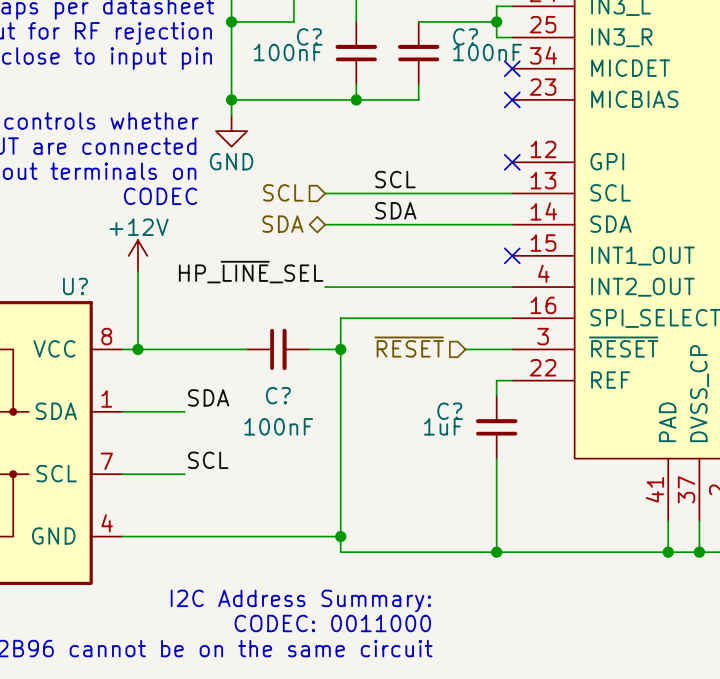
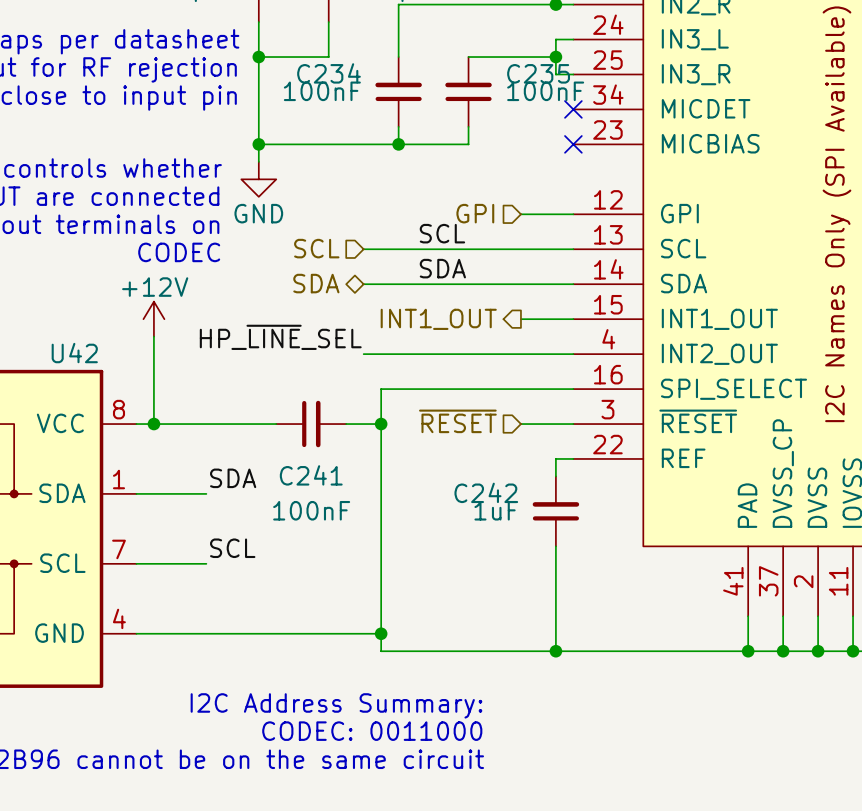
C? name: C? (309, 36) -> C234 (329, 73)
C? name: C? (465, 36) -> C235 (538, 73)
hierarchical label: none -> GPI (475, 213)
wire: none -> (520, 214) (573, 214)
no-connect mark: (512, 162) -> none
wire: none -> (520, 319) (573, 319)
no-connect mark: (512, 255) -> none
hierarchical label: none -> INT1_OUT (438, 319)
U? name: U? (75, 286) -> U42 (74, 353)
C? name: C? (278, 395) -> C241 (311, 475)
C? name: C? (449, 411) -> C242 (485, 492)

